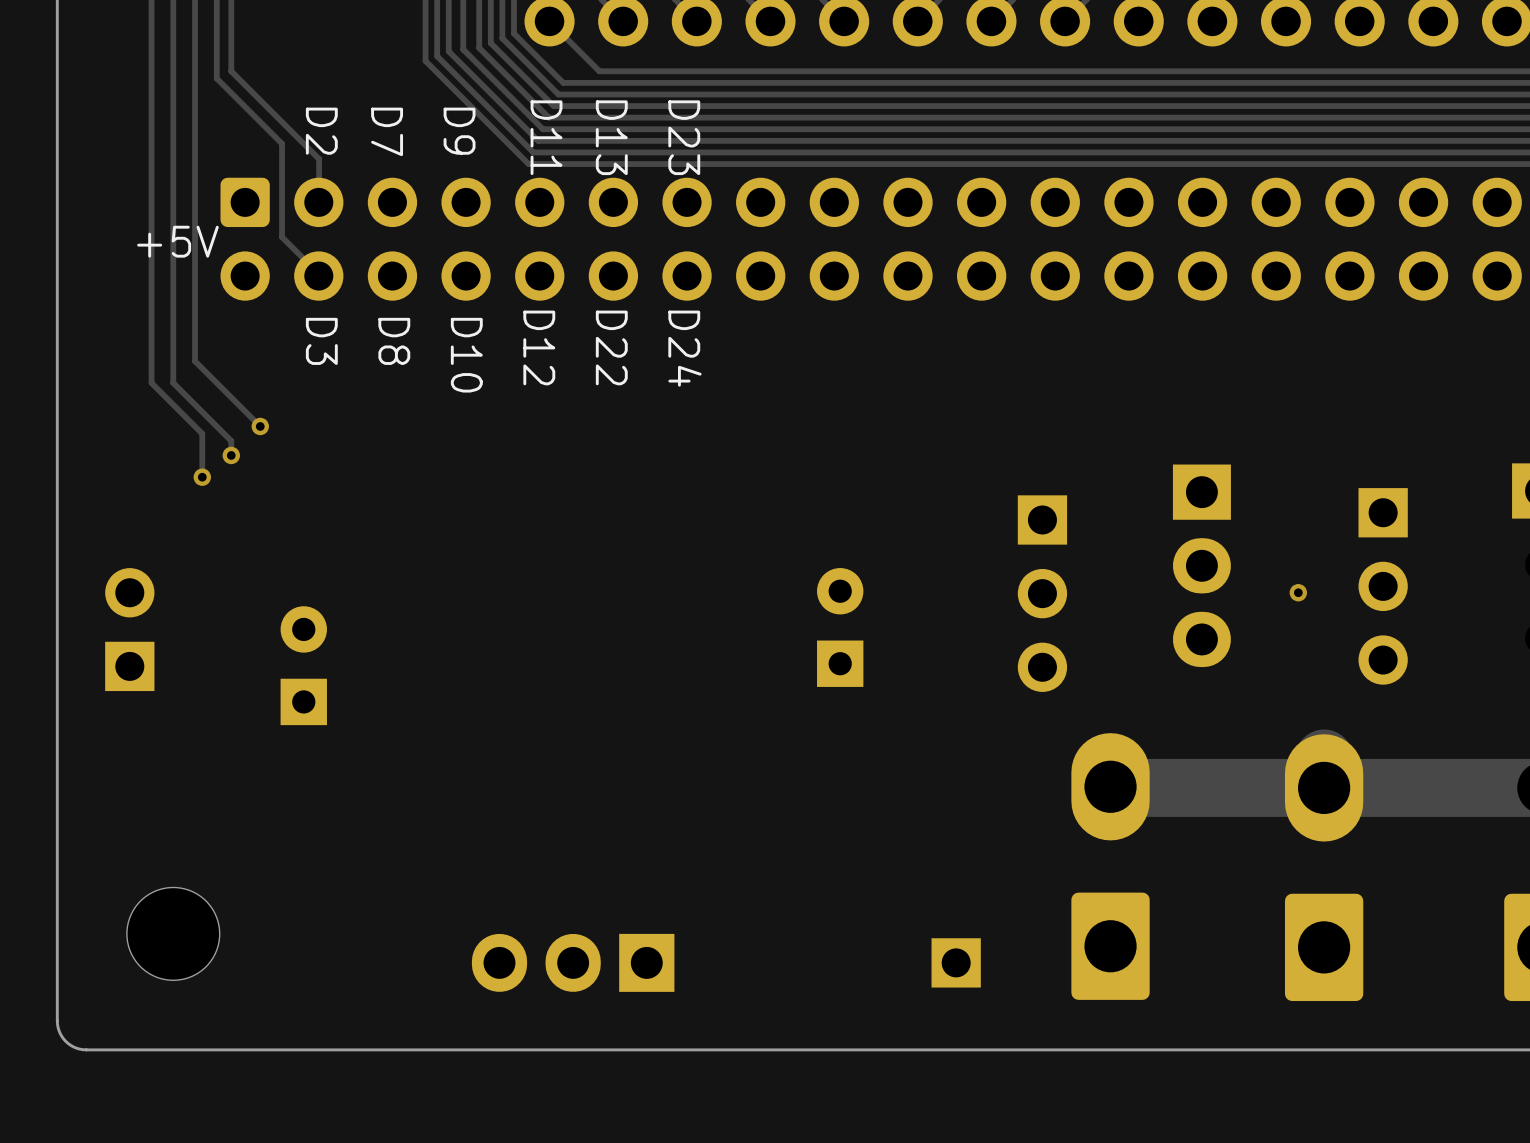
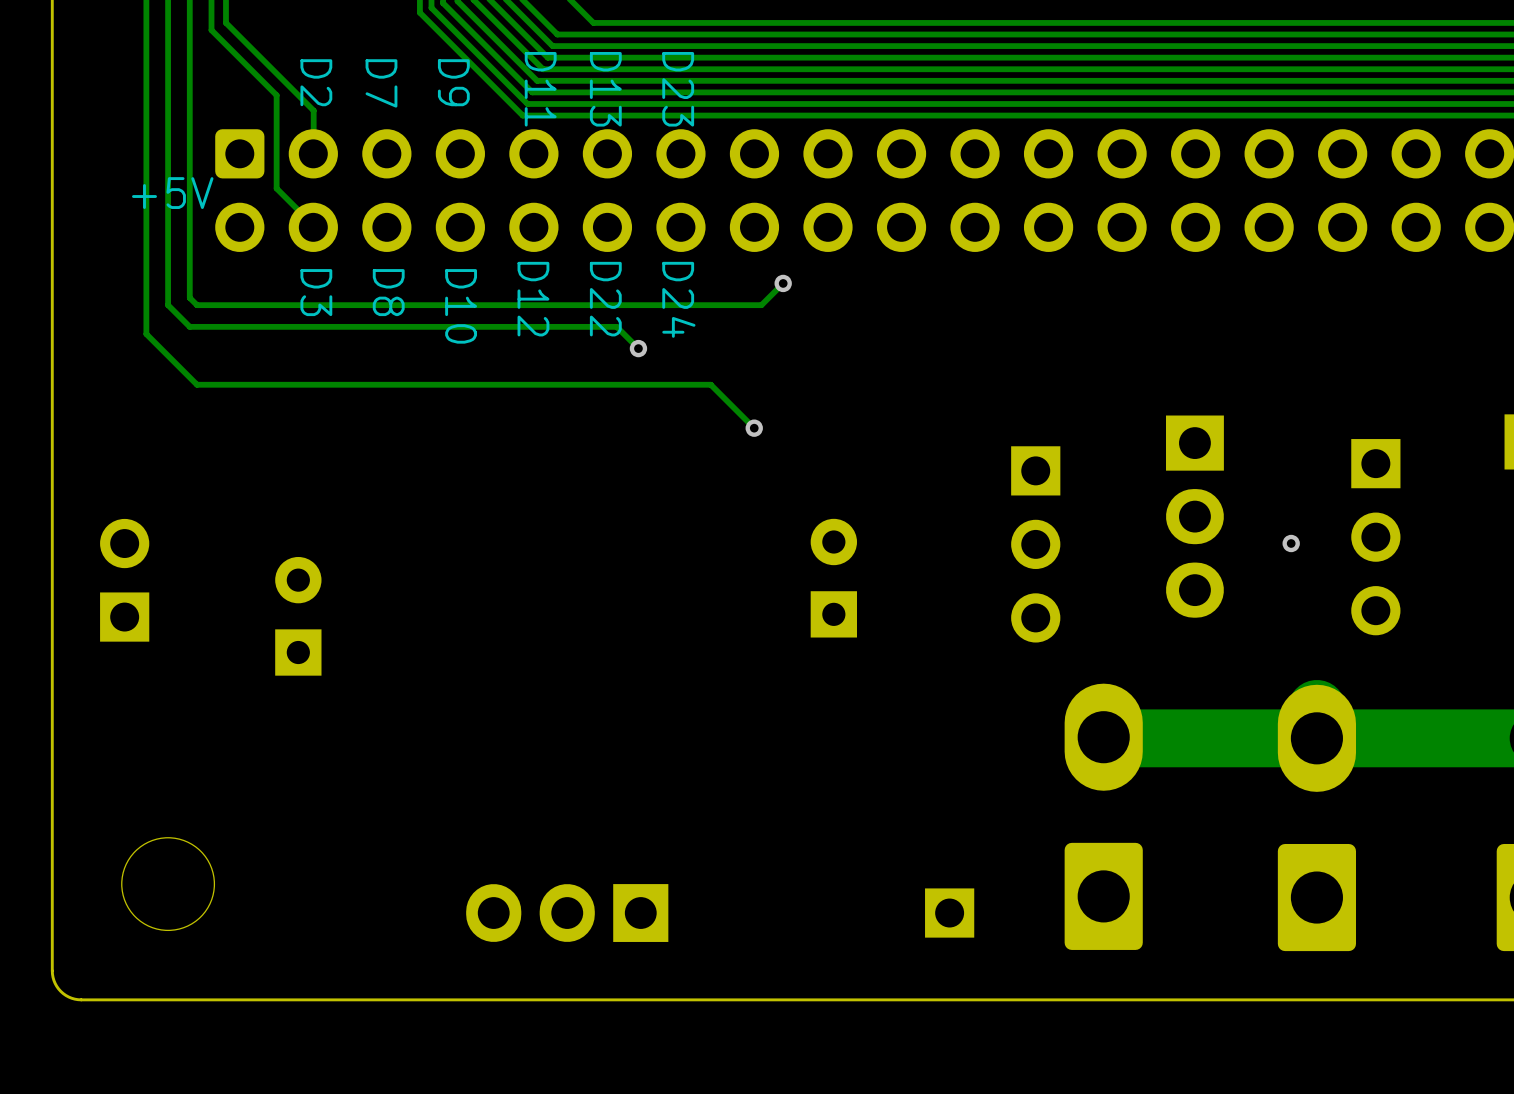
via: none -> (783, 283)
track: (195, 346) (195, 361) (260, 426) -> (189, 297) (197, 305) (761, 305) (783, 283)
track: (173, 353) (173, 382) (231, 440) (231, 455) -> (168, 305) (189, 326) (616, 326) (638, 348)
via: none -> (638, 348)
via: (260, 426) -> none
track: (202, 433) (202, 477) -> (197, 384) (710, 384) (754, 428)
via: (231, 455) -> none
via: (202, 477) -> none
via: none -> (754, 428)

